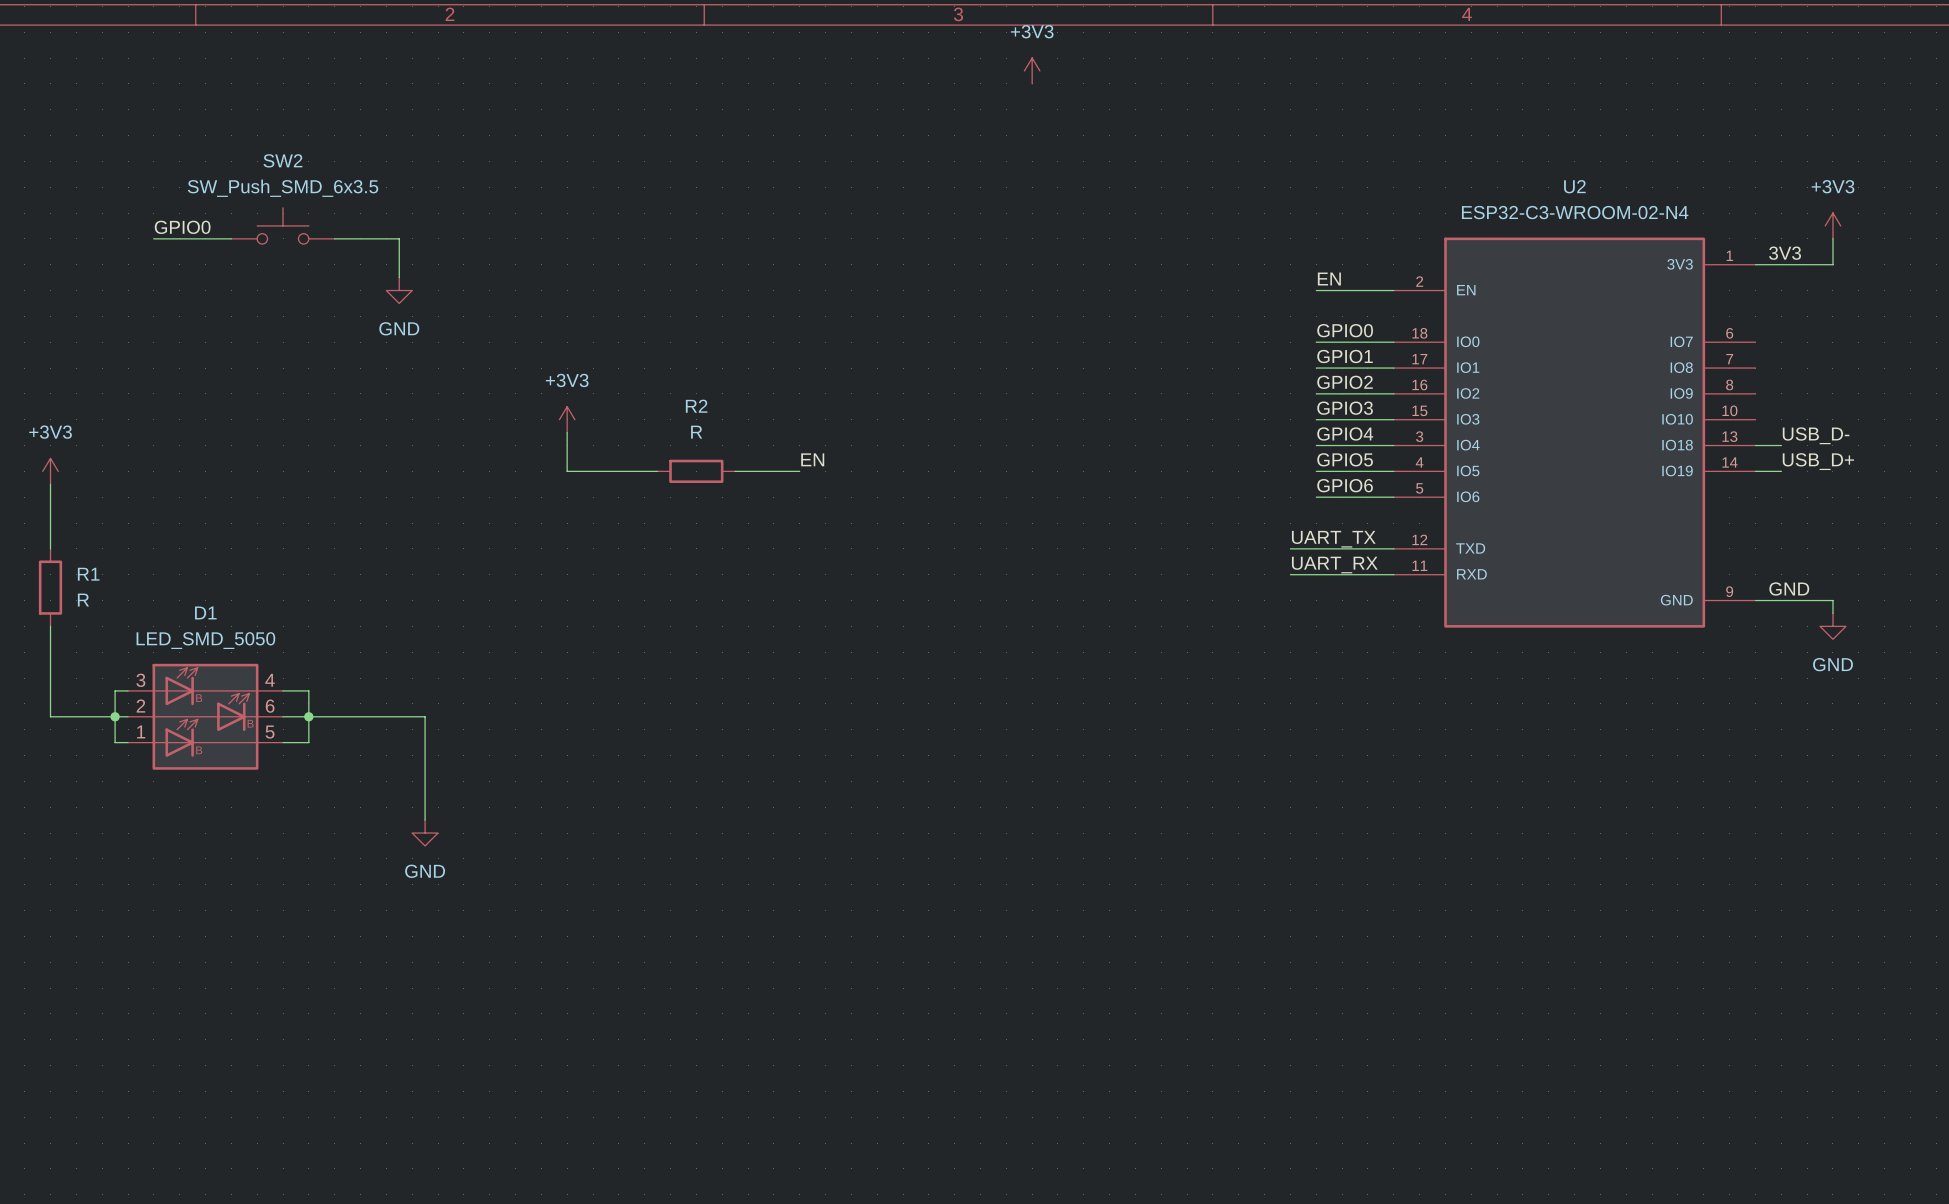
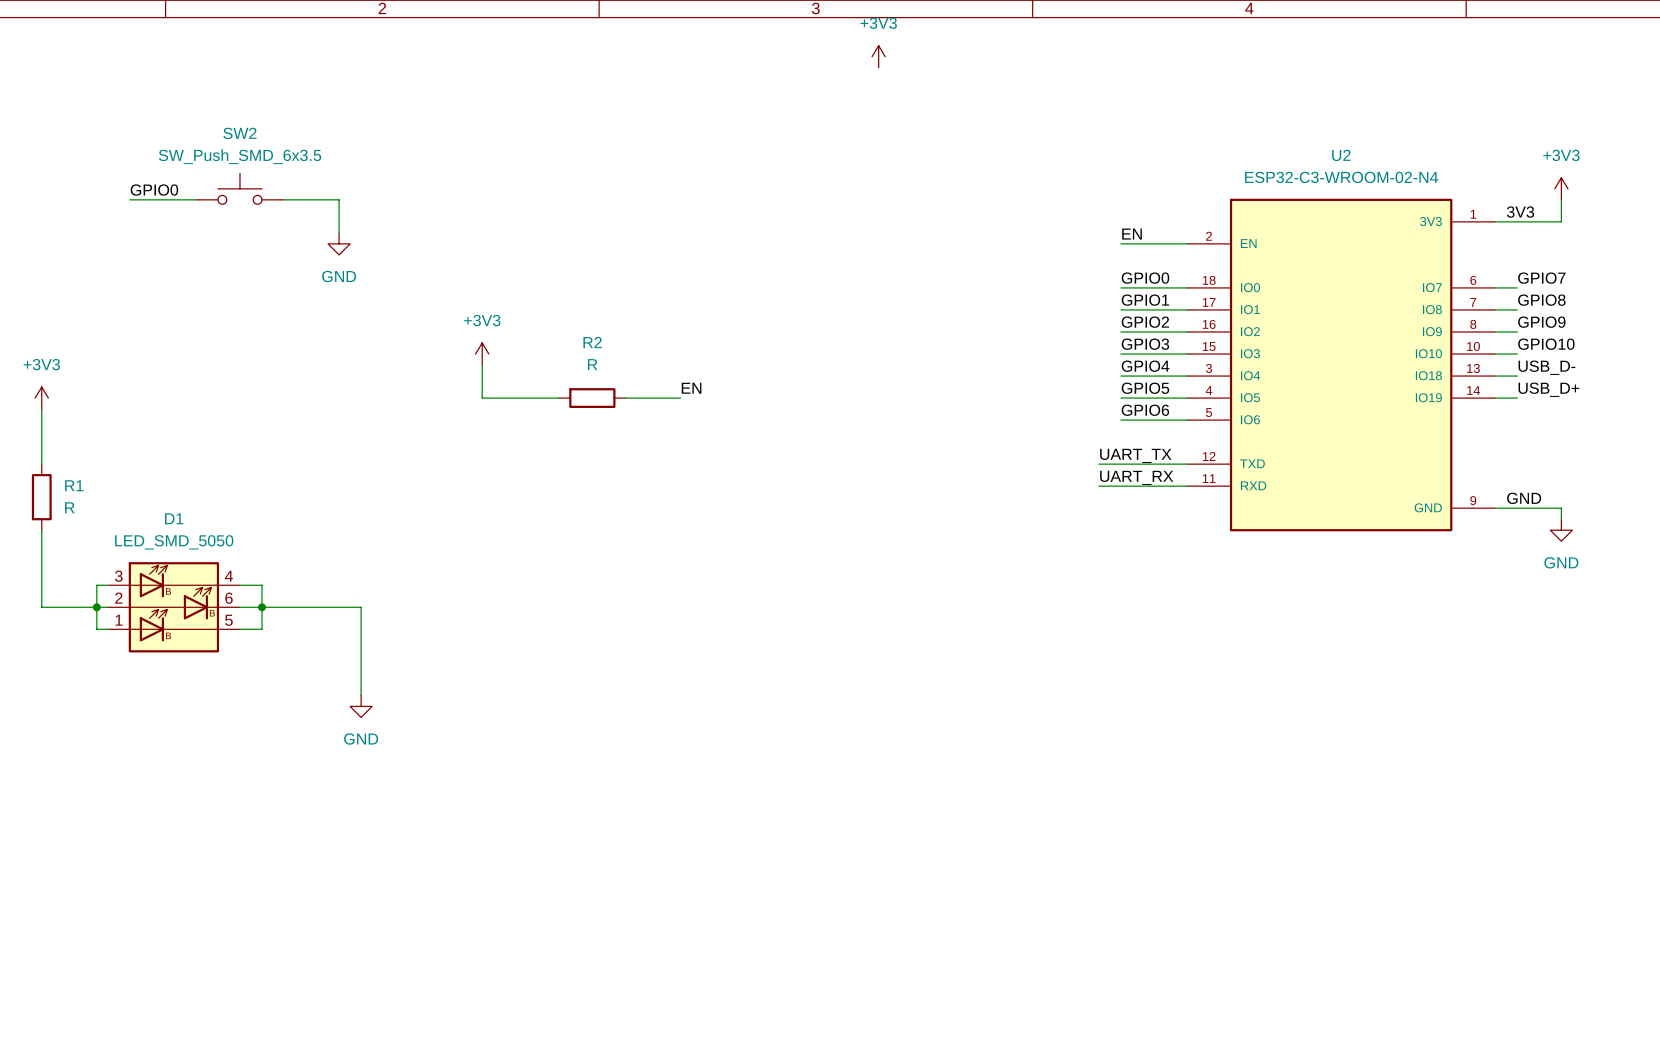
label: none -> GPIO7 (1541, 278)
wire: none -> (1495, 287) (1517, 287)
label: none -> GPIO8 (1541, 300)
wire: none -> (1495, 309) (1517, 309)
label: none -> GPIO9 (1541, 322)
wire: none -> (1495, 331) (1517, 331)
label: none -> GPIO10 (1546, 344)
wire: none -> (1495, 354) (1517, 354)

